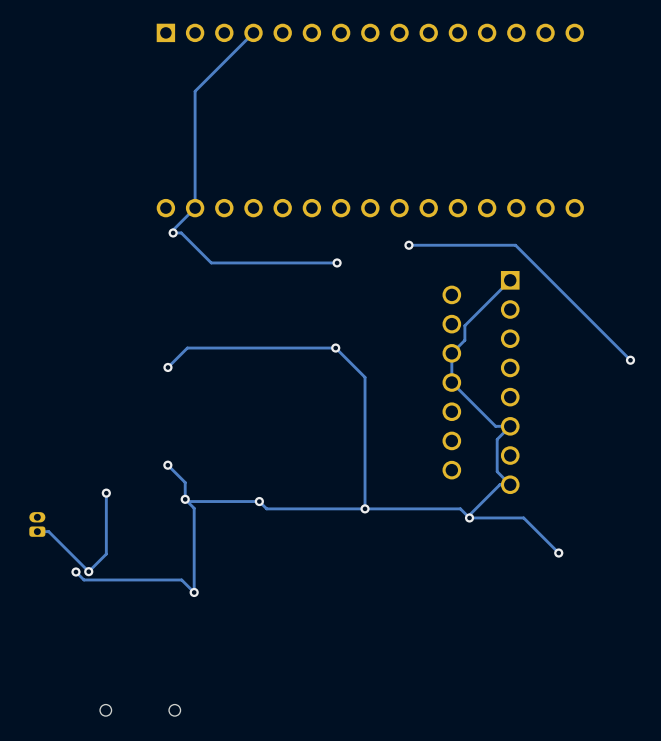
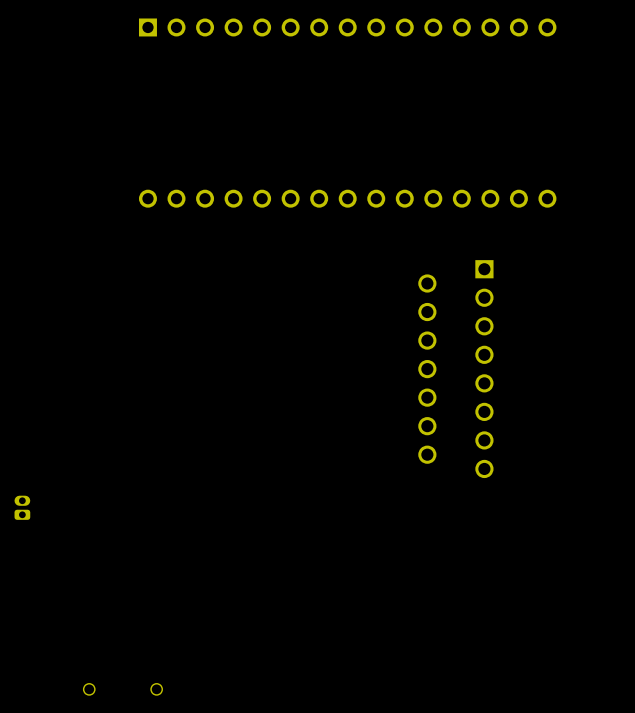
track: (253, 32) (195, 91) (195, 208) (173, 230) (173, 232) (181, 232) (211, 262) (337, 262) -> none
via: (173, 232) -> none
track: (408, 245) (515, 245) (630, 360) -> none
via: (408, 245) -> none
via: (337, 262) -> none
track: (510, 280) (464, 325) (464, 340) (451, 353) (451, 382) (495, 426) (510, 426) (497, 439) (497, 471) (513, 487) -> none
via: (335, 348) -> none
via: (630, 360) -> none
track: (167, 367) (187, 348) (335, 348) (365, 377) (365, 508) -> none
via: (167, 367) -> none
track: (167, 465) (185, 482) (185, 499) (194, 508) (194, 592) (181, 579) (83, 579) (75, 572) -> none
via: (167, 465) -> none
track: (510, 484) (499, 484) (469, 515) (469, 517) -> none
track: (106, 493) (106, 554) (88, 571) (48, 531) (37, 531) -> none
via: (106, 493) -> none
via: (185, 499) -> none
track: (187, 501) (259, 501) (266, 508) (460, 508) (469, 517) -> none
via: (259, 501) -> none
via: (365, 508) -> none
track: (469, 517) (523, 517) (558, 553) -> none
via: (469, 517) -> none
via: (558, 553) -> none
via: (88, 571) -> none
via: (75, 572) -> none
via: (194, 592) -> none

